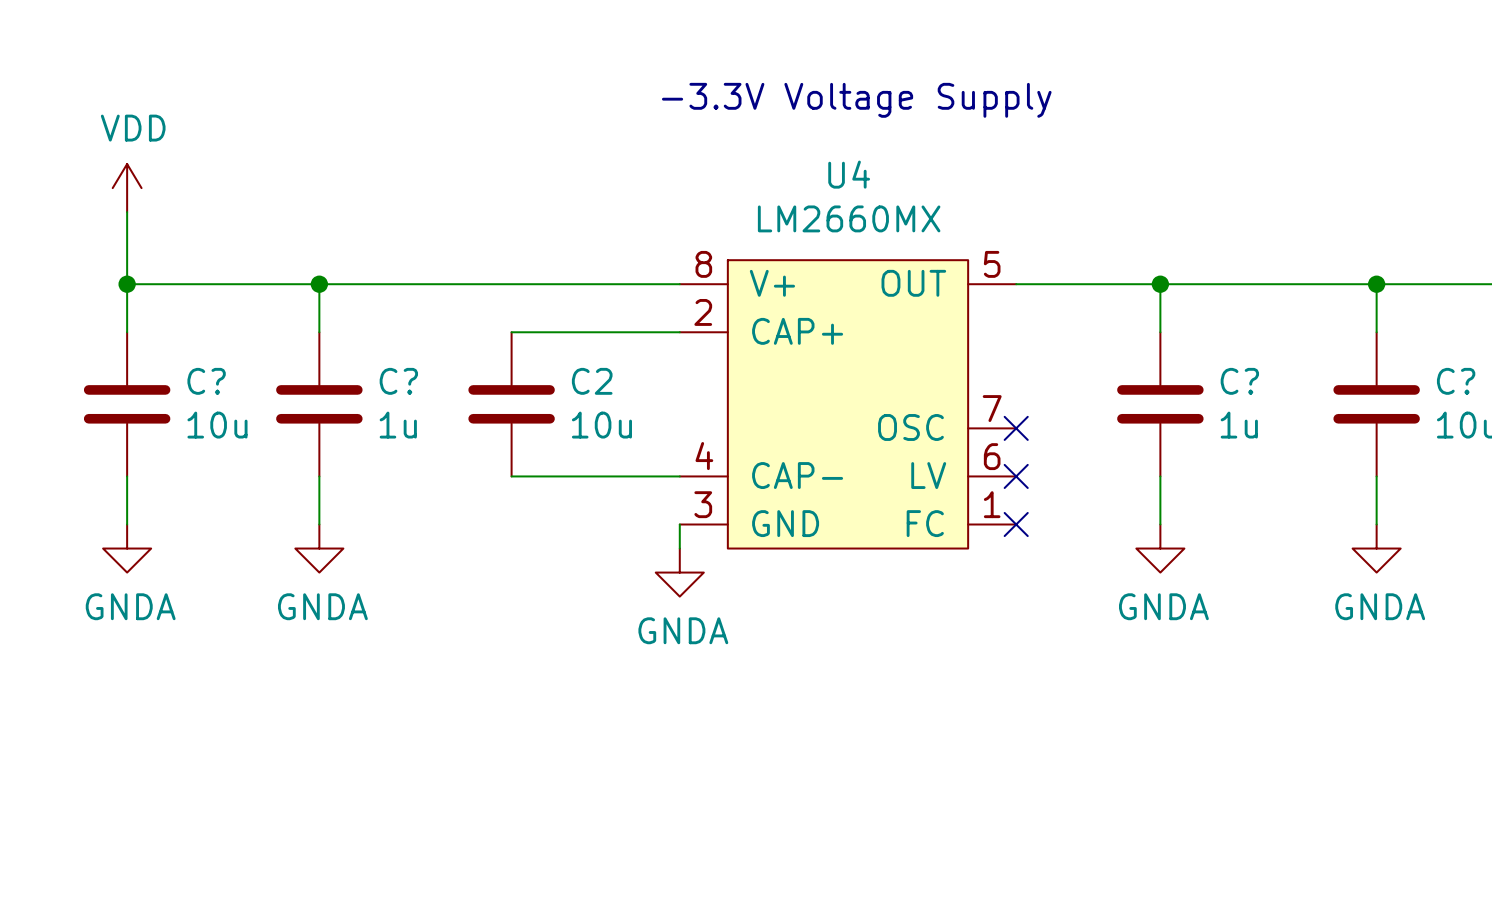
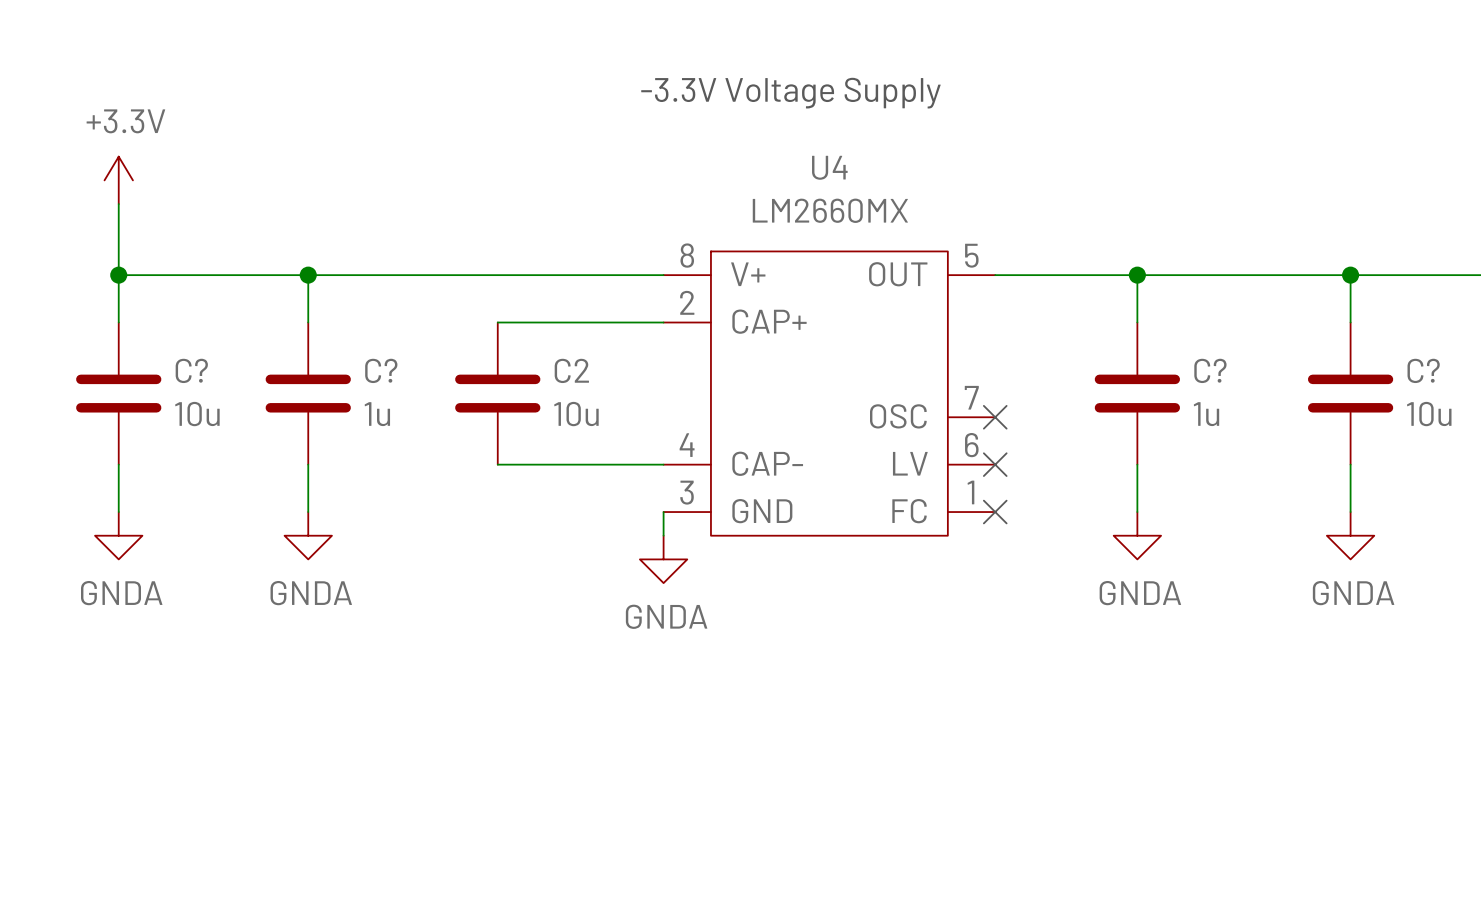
power symbol: VDD (127, 188) -> +3.3V (118, 180)

